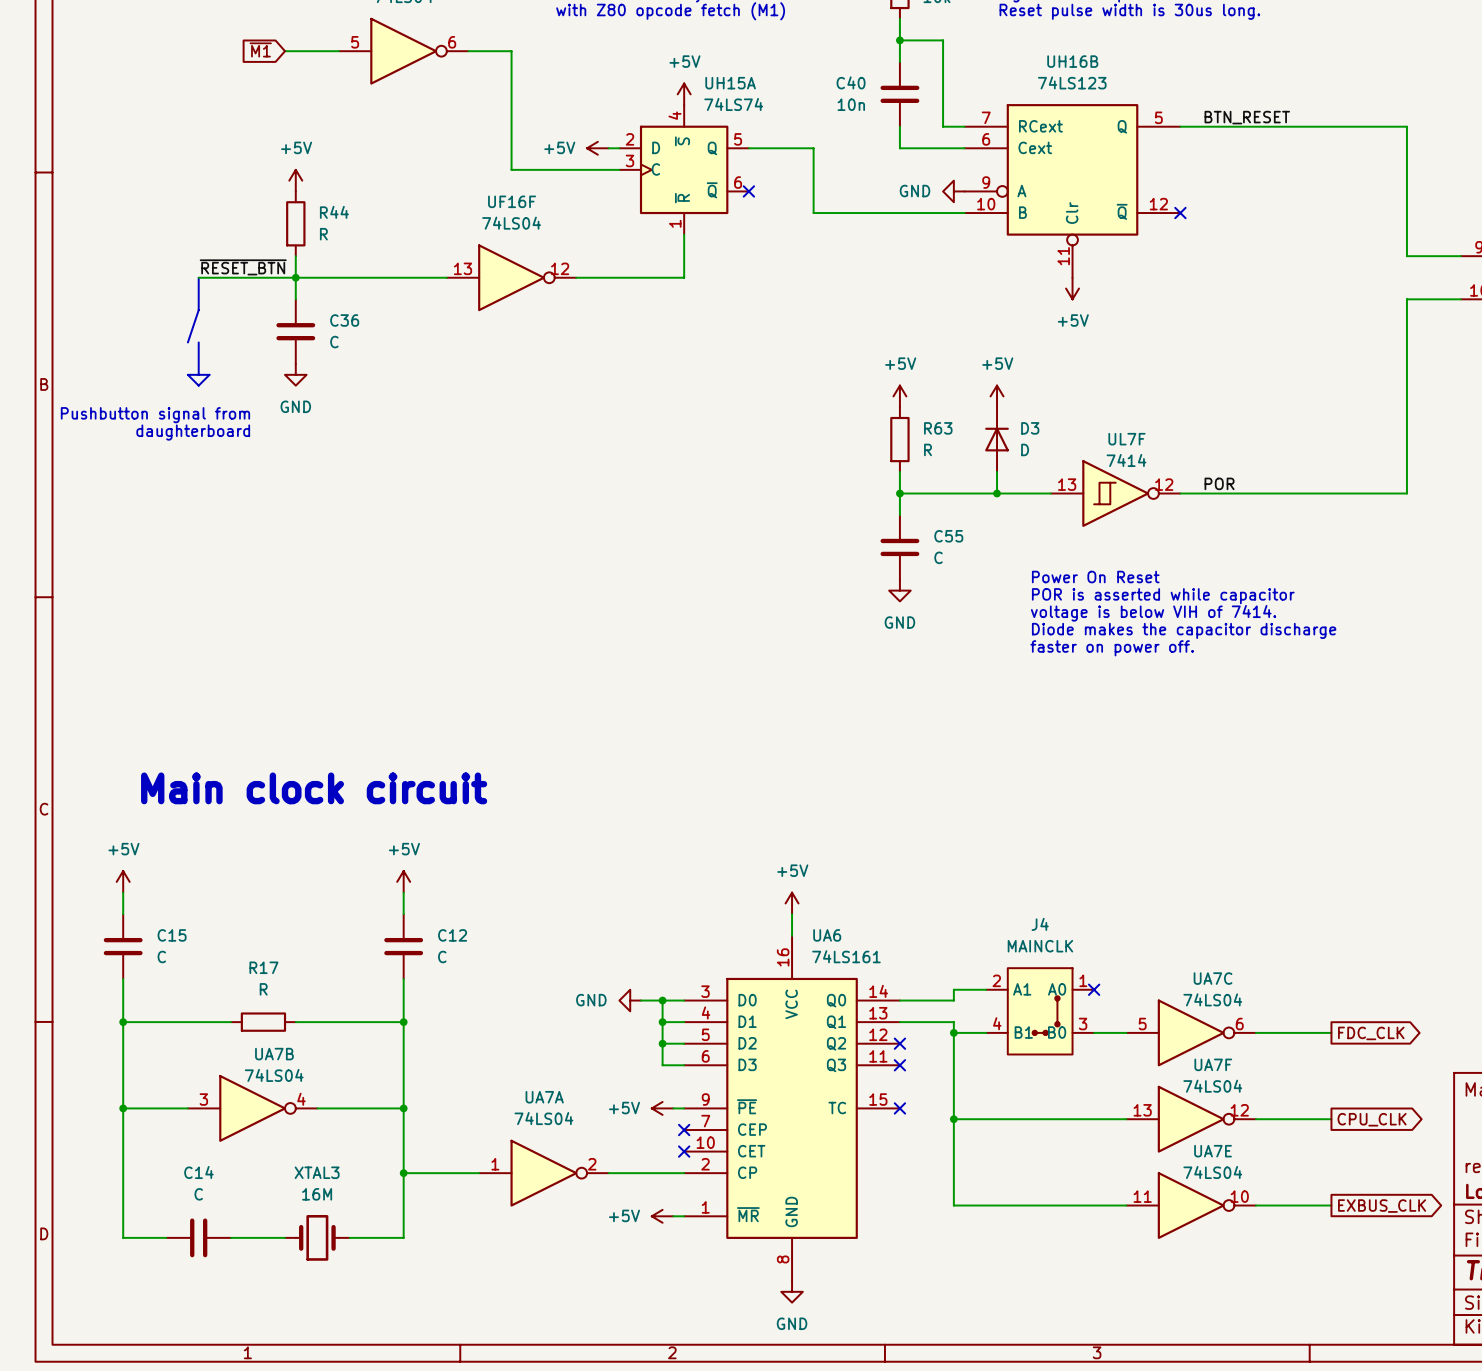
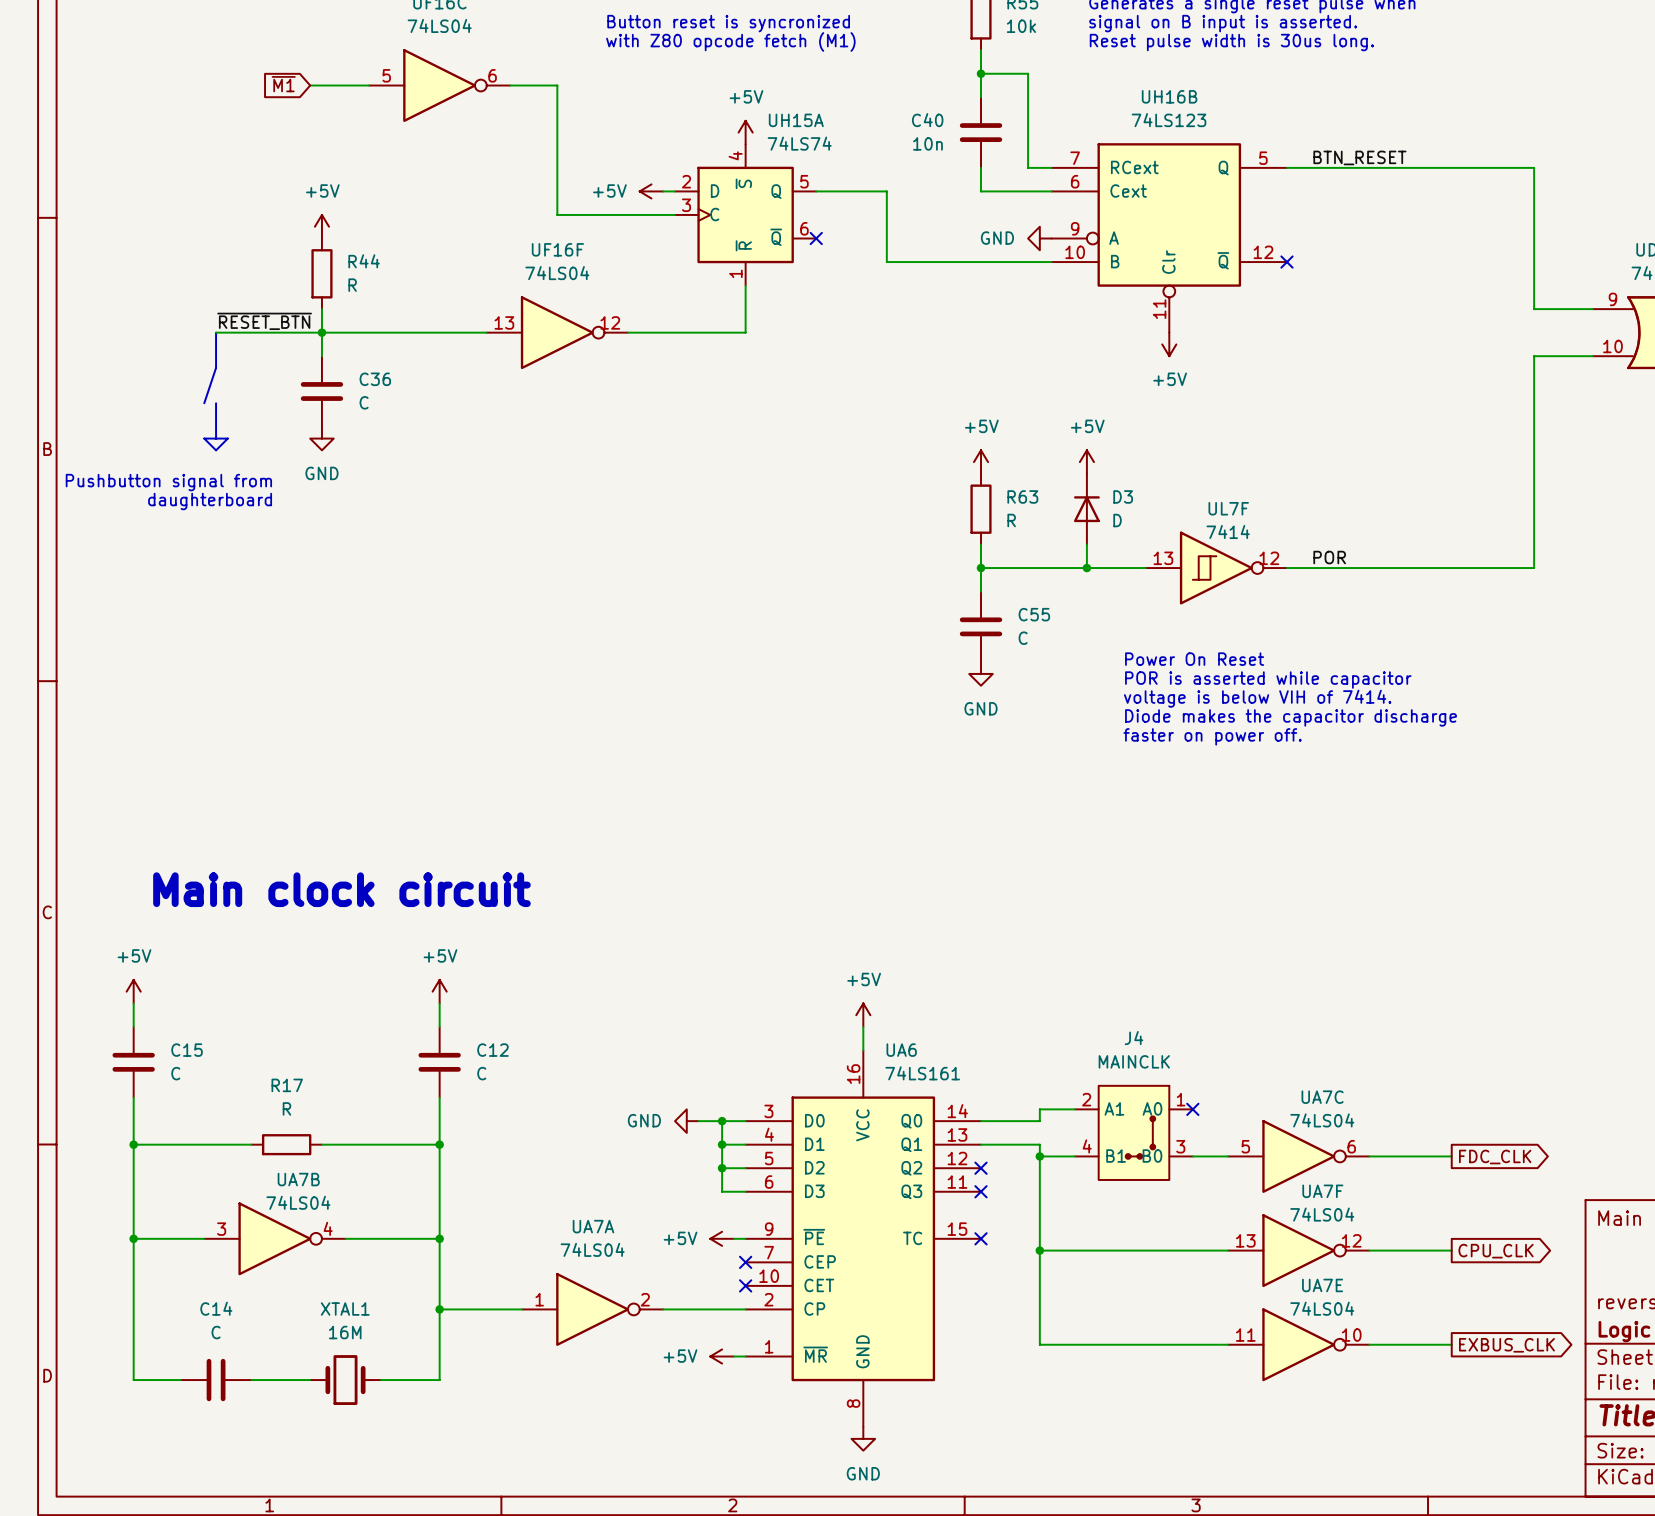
XTAL3 name: XTAL3 (317, 1172) -> XTAL1 (345, 1308)

